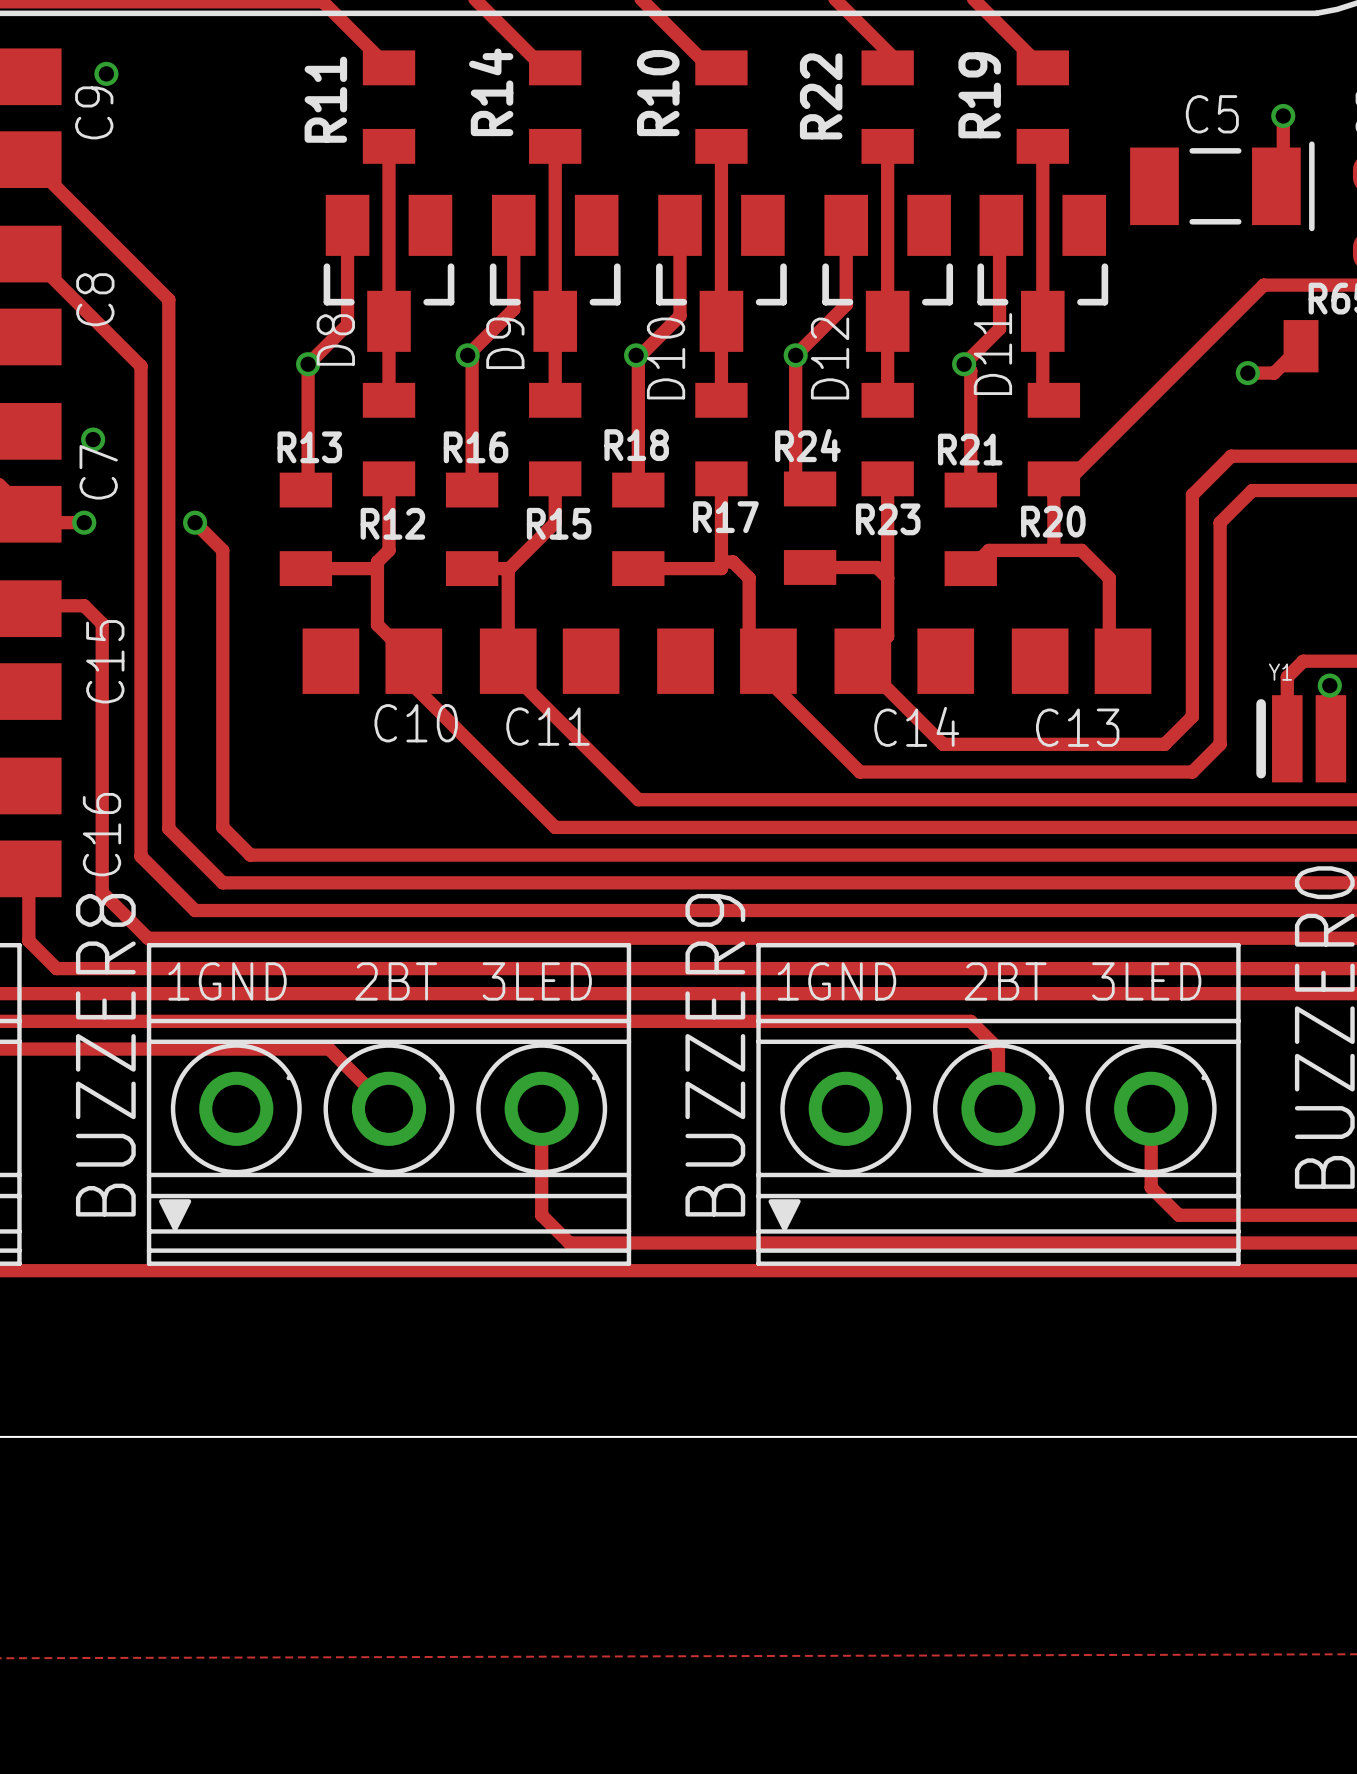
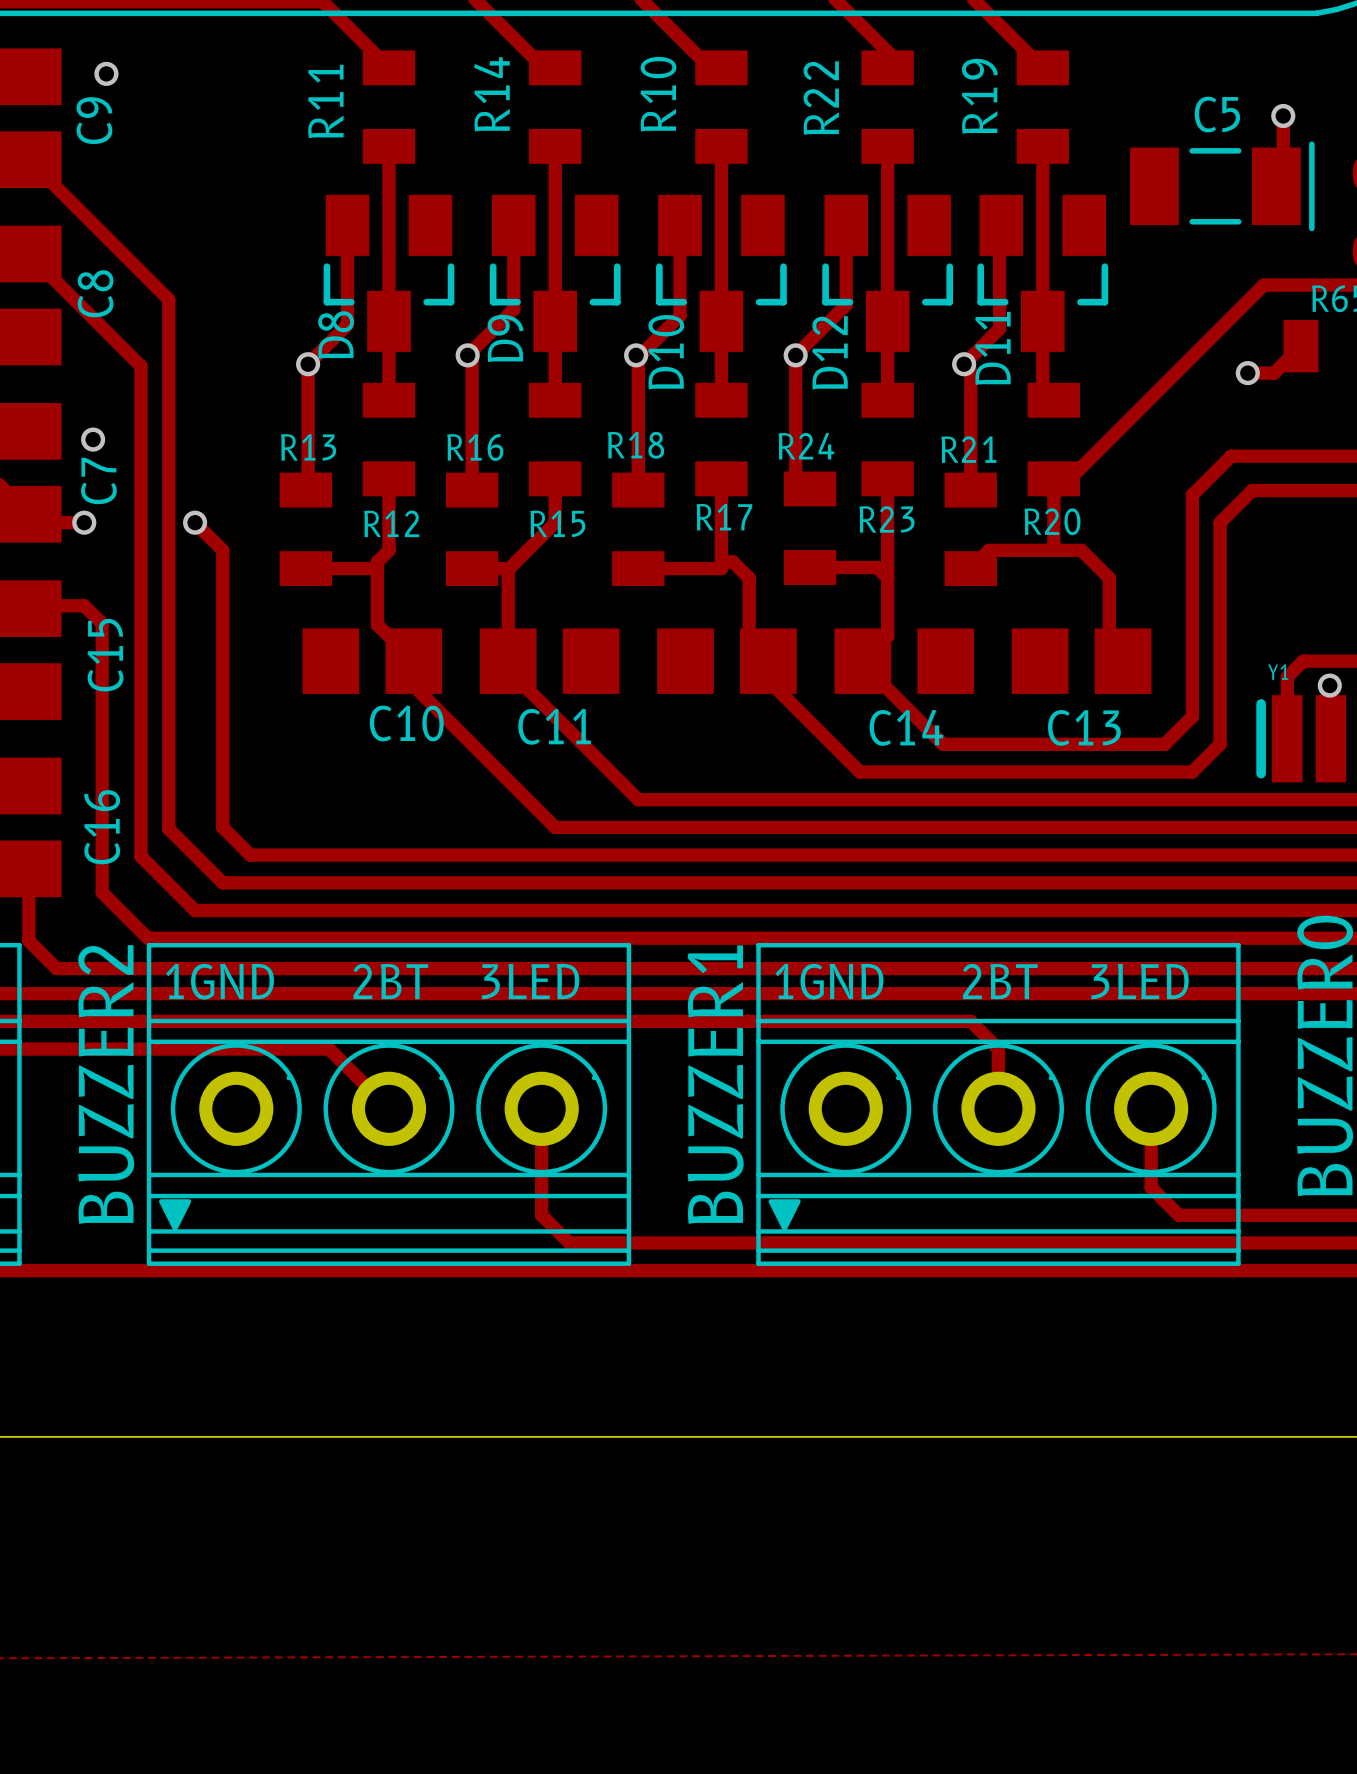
BUZZER8 name: BUZZER8 (105, 1055) -> BUZZER2 (106, 1084)
BUZZER9 name: BUZZER9 (715, 1055) -> BUZZER1 (715, 1084)

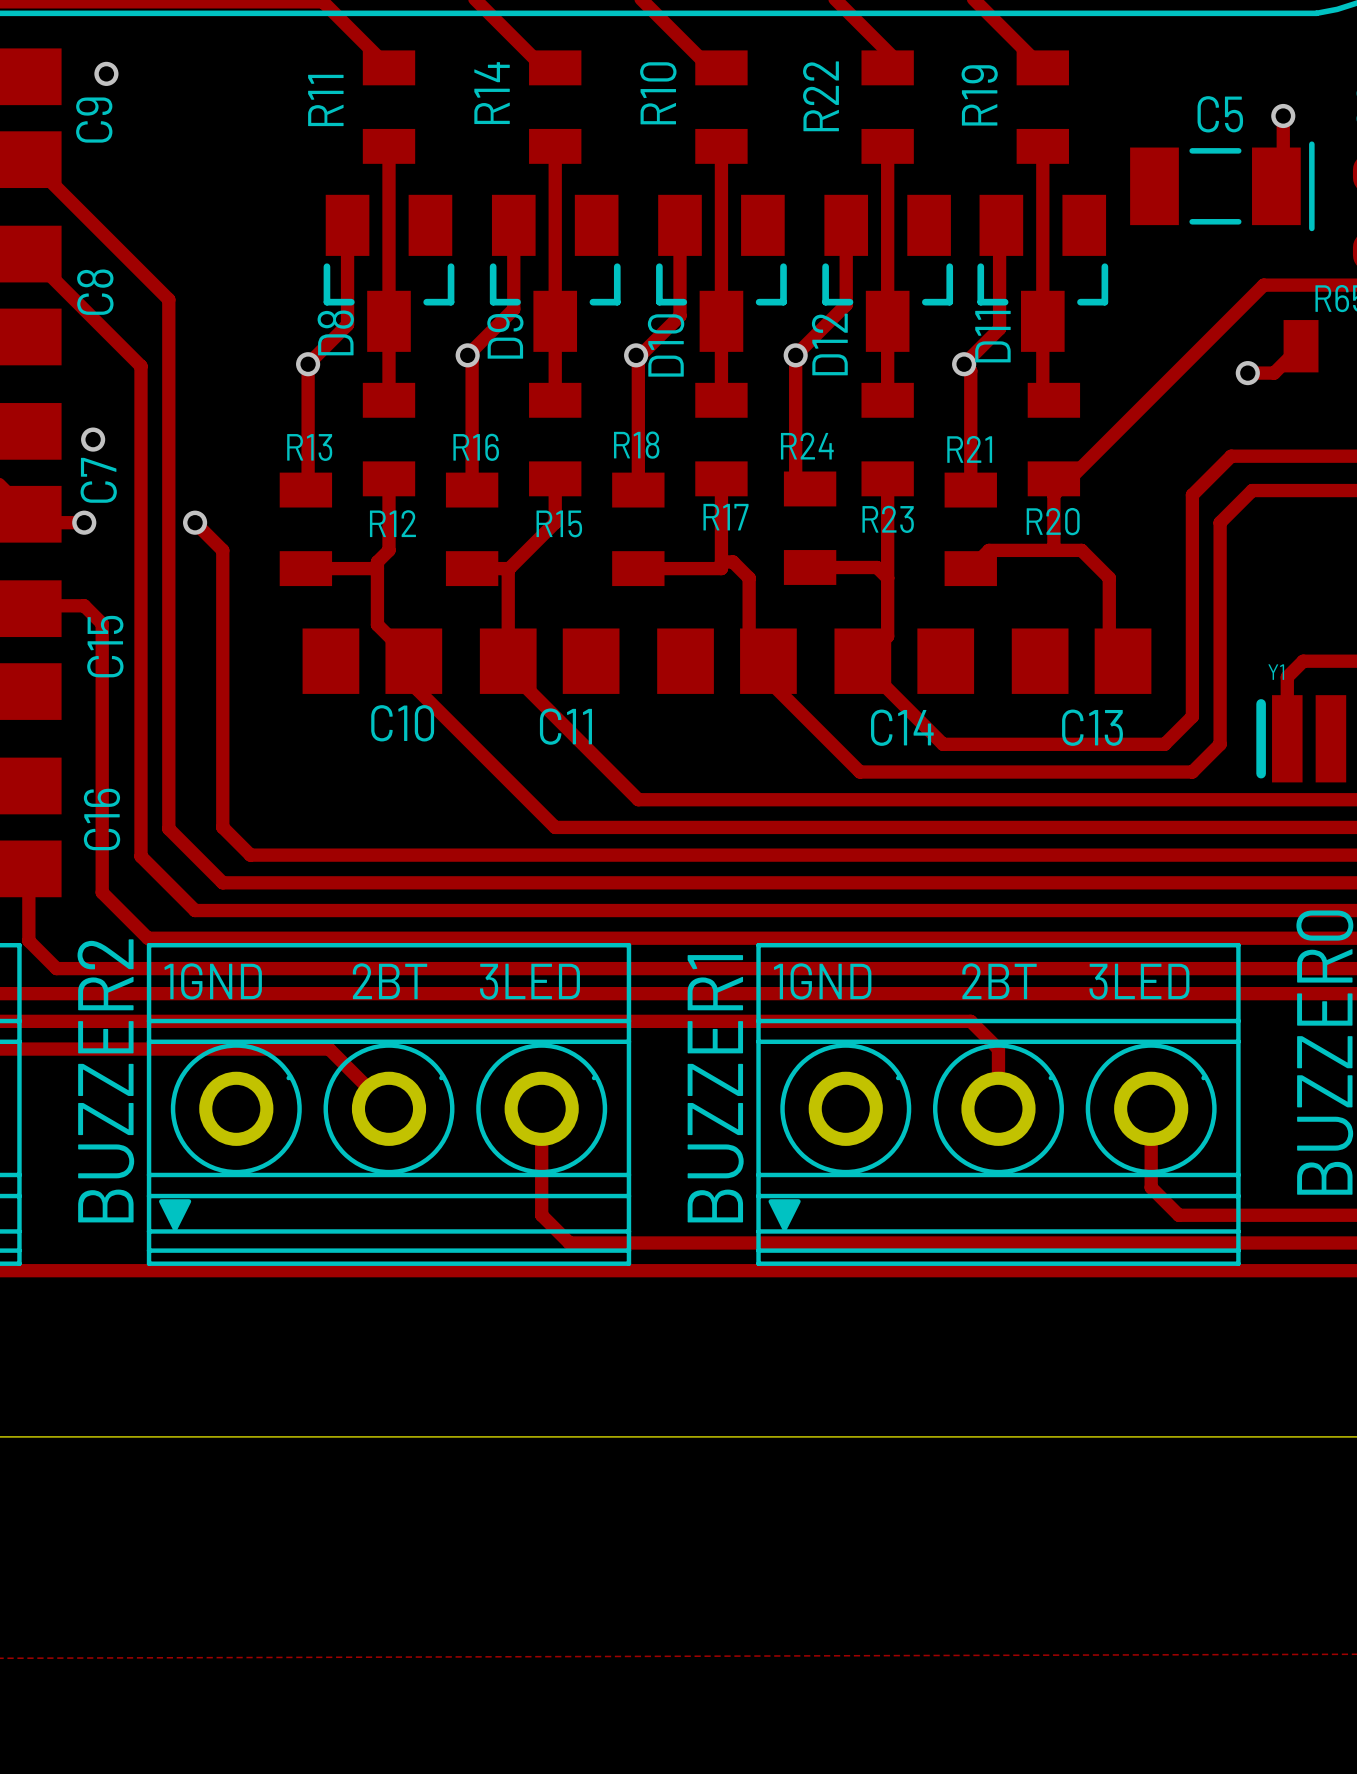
via: (1329, 685) -> none

